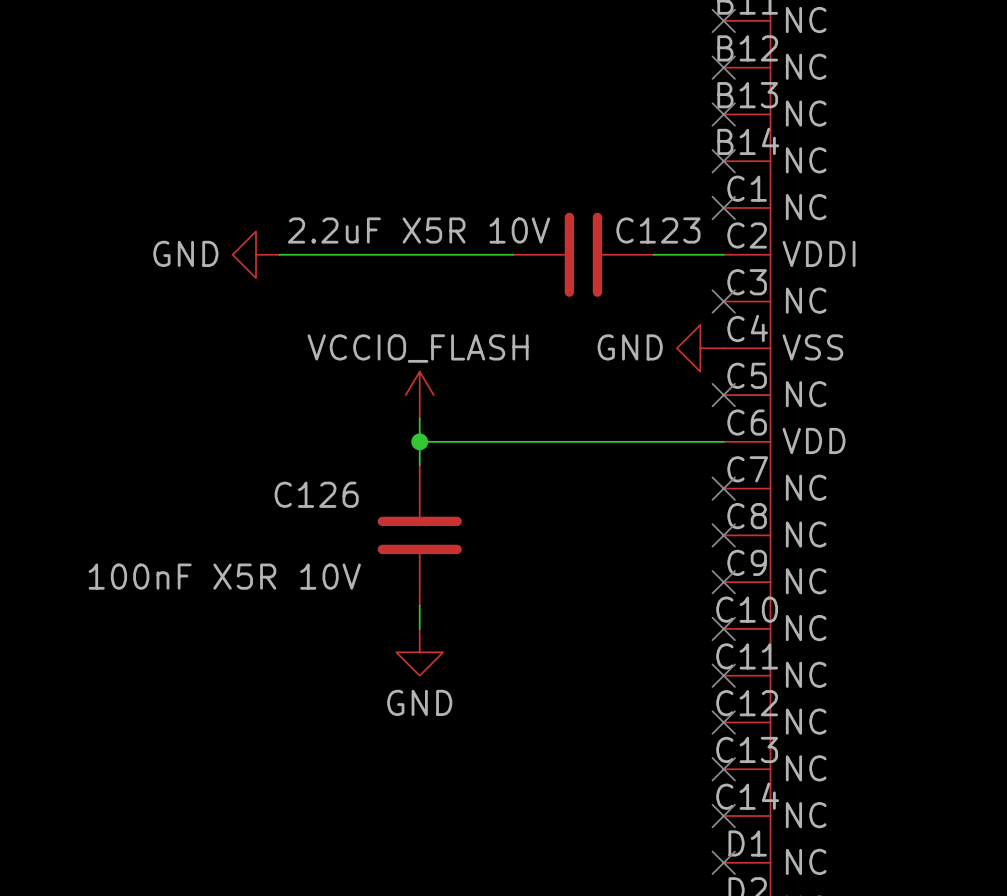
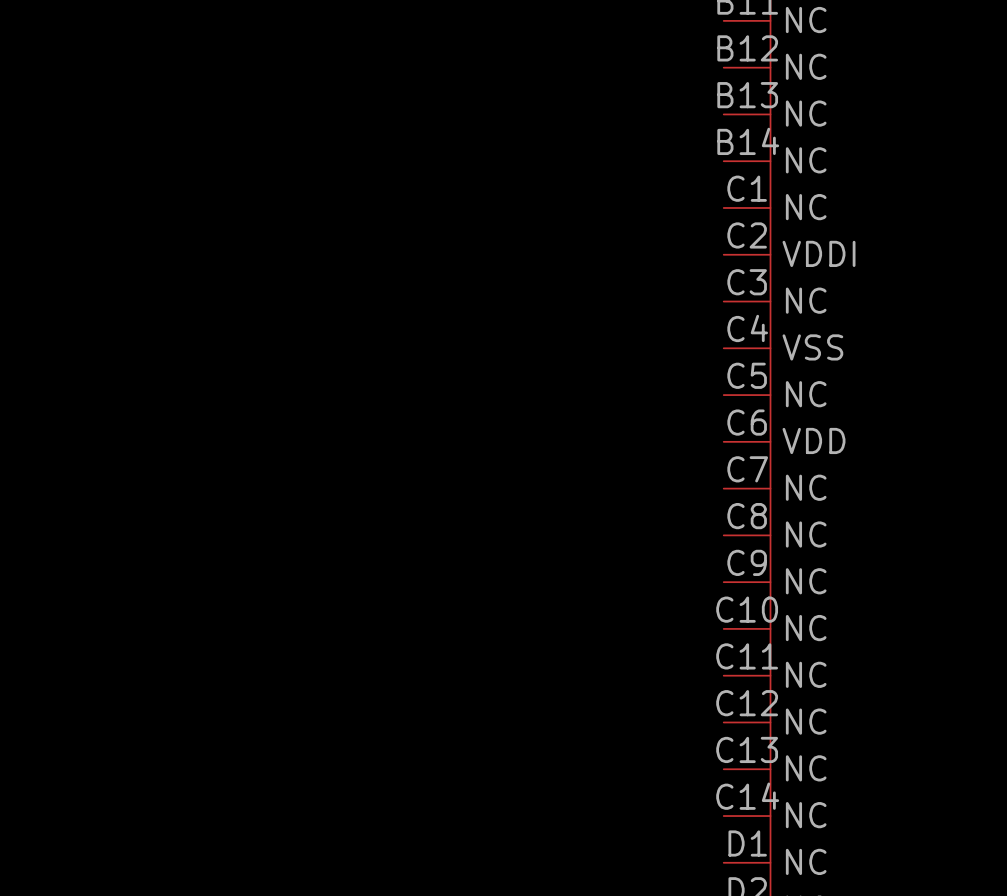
no-connect mark: (723, 20) -> none
no-connect mark: (723, 67) -> none
no-connect mark: (723, 114) -> none
no-connect mark: (723, 161) -> none
no-connect mark: (723, 207) -> none
power symbol: GND (256, 254) -> none
wire: (279, 254) (513, 254) -> none
C123: 2.2uF X5R 10V (583, 254) -> none
wire: (653, 254) (723, 254) -> none
no-connect mark: (723, 301) -> none
power symbol: GND (700, 348) -> none
power symbol: VCCIO_FLASH (419, 395) -> none
no-connect mark: (723, 395) -> none
wire: (419, 418) (419, 465) -> none
wire: (419, 441) (723, 441) -> none
junction: (419, 441) -> none
no-connect mark: (723, 488) -> none
C126: 100nF X5R 10V (419, 535) -> none
no-connect mark: (723, 535) -> none
no-connect mark: (723, 582) -> none
wire: (419, 605) (419, 628) -> none
no-connect mark: (723, 628) -> none
power symbol: GND (419, 652) -> none
no-connect mark: (723, 675) -> none
no-connect mark: (723, 722) -> none
no-connect mark: (723, 769) -> none
no-connect mark: (723, 816) -> none
no-connect mark: (723, 862) -> none

